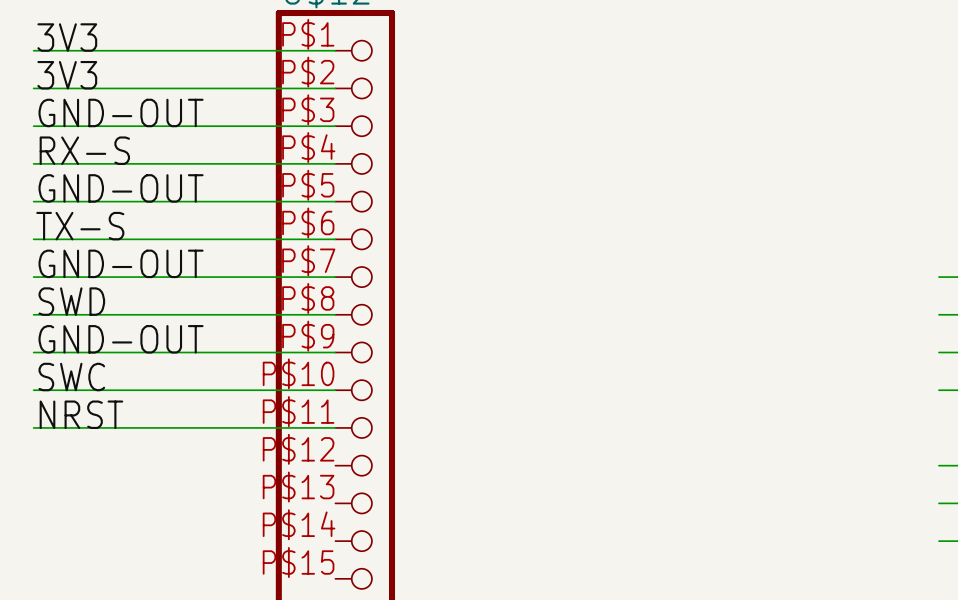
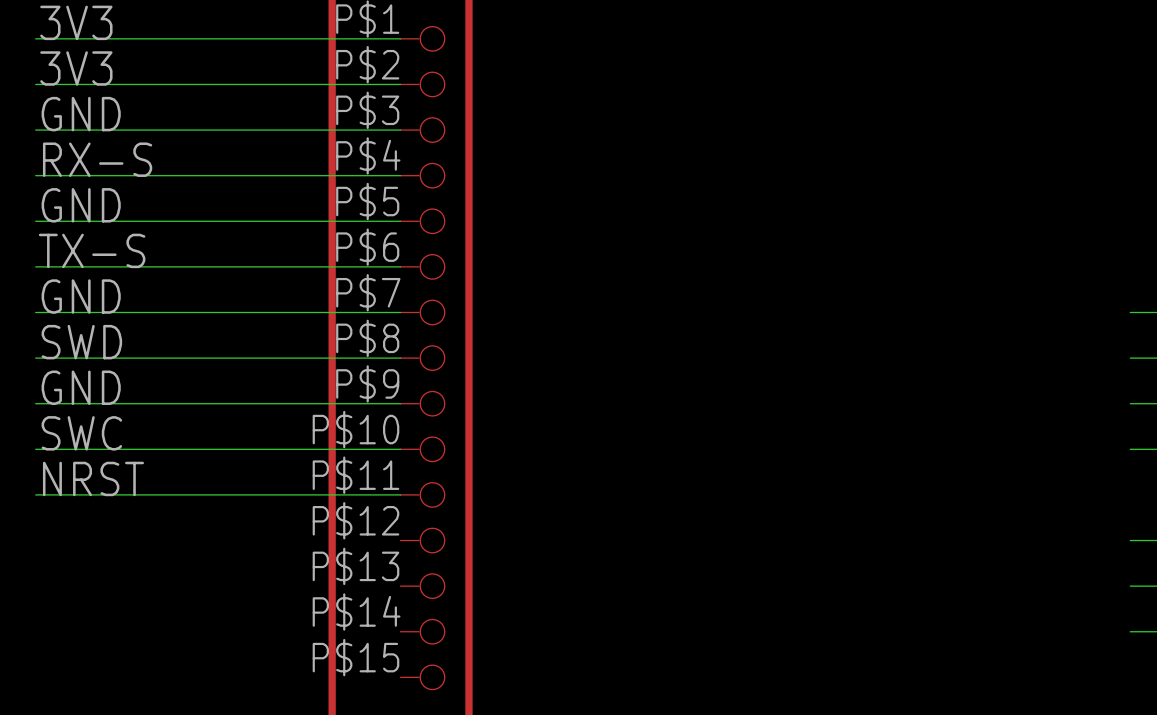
label: GND-OUT (121, 112) -> GND (81, 114)
label: GND-OUT (121, 188) -> GND (81, 205)
label: GND-OUT (121, 263) -> GND (81, 296)
label: GND-OUT (121, 339) -> GND (81, 387)

